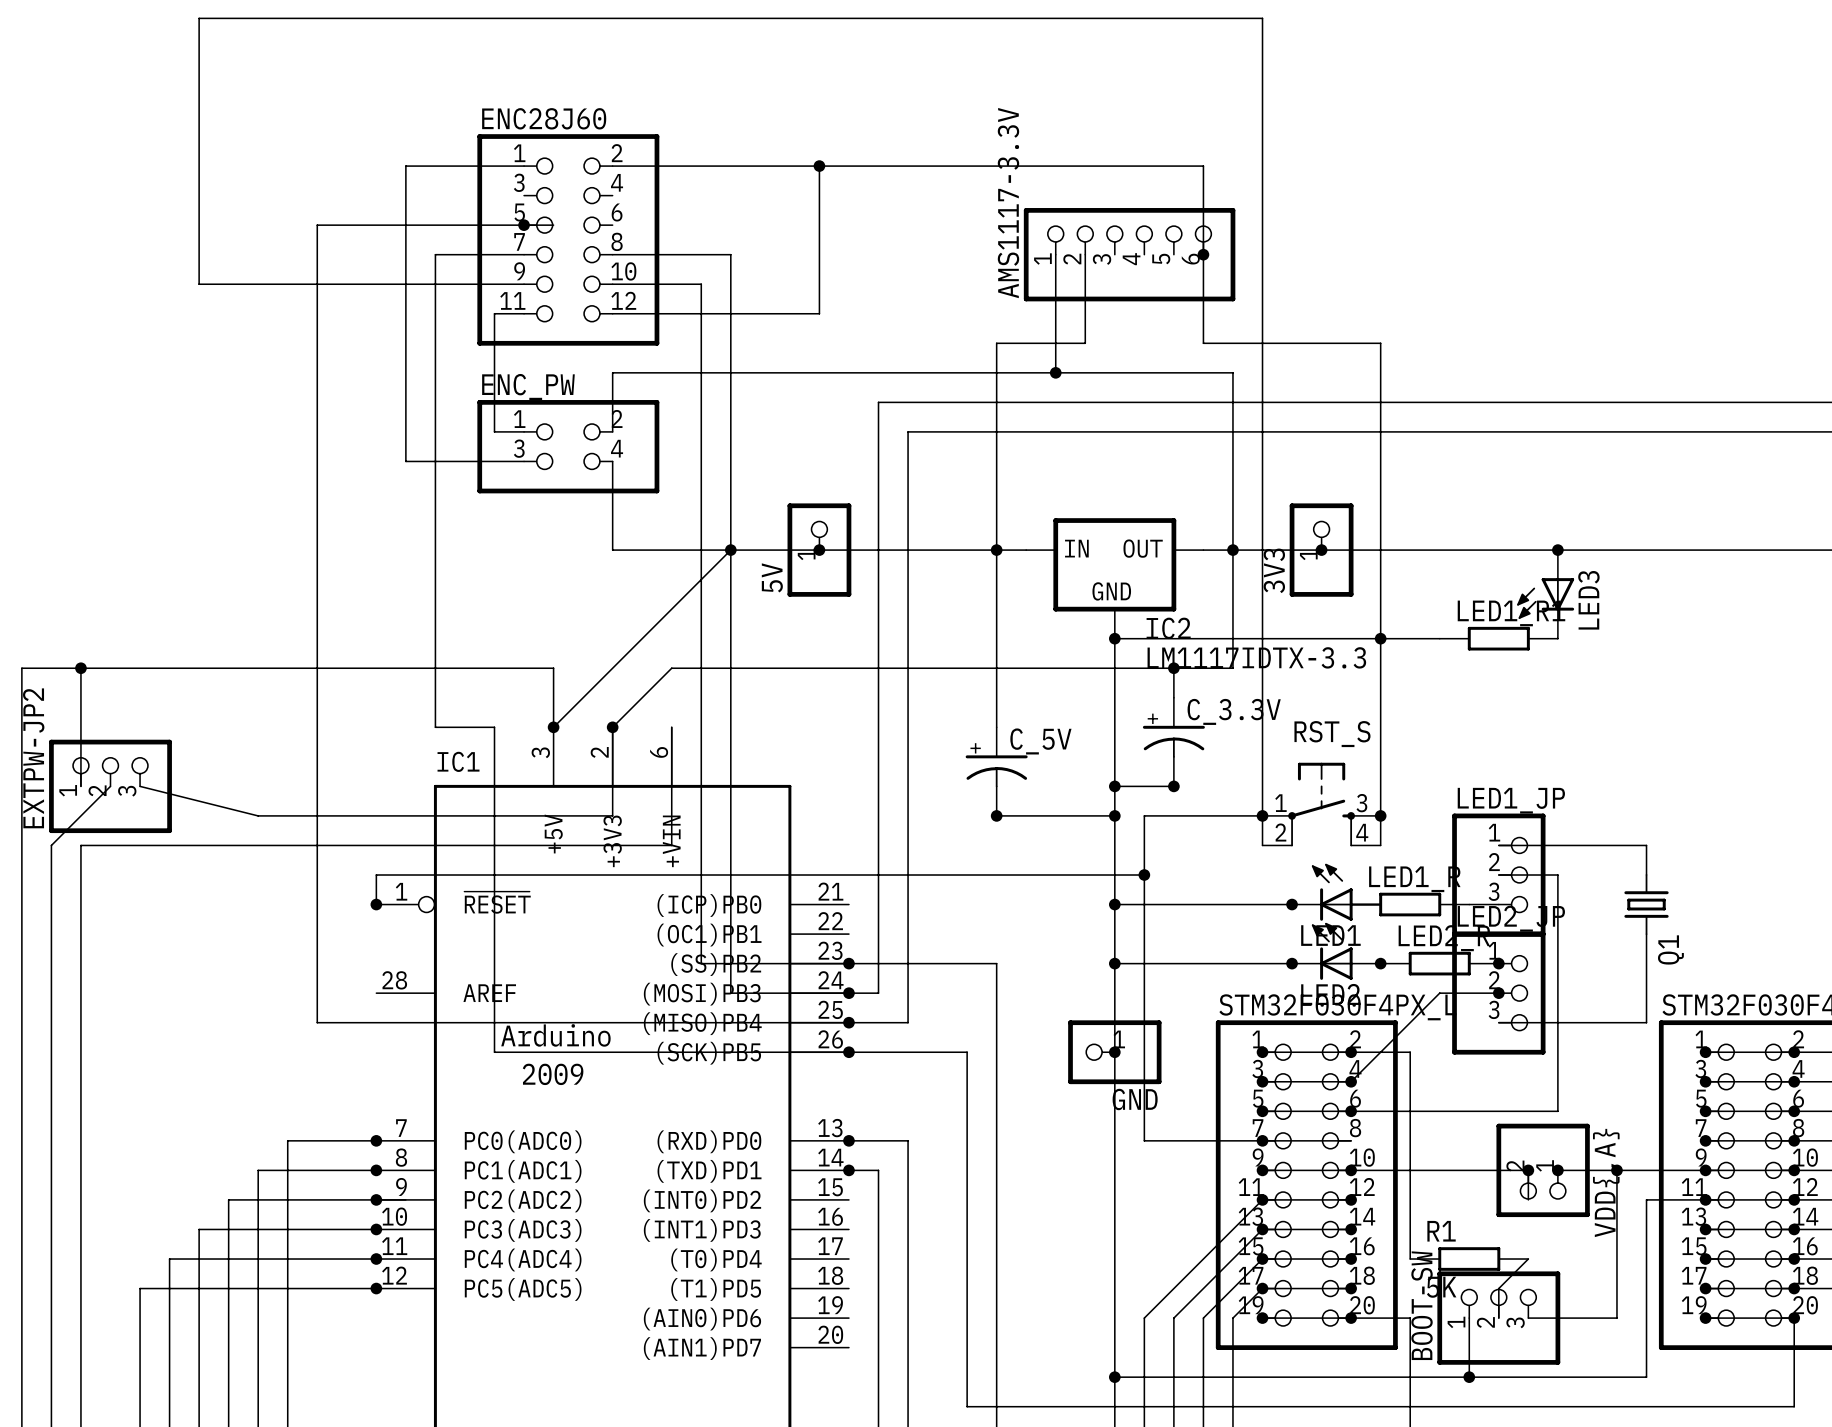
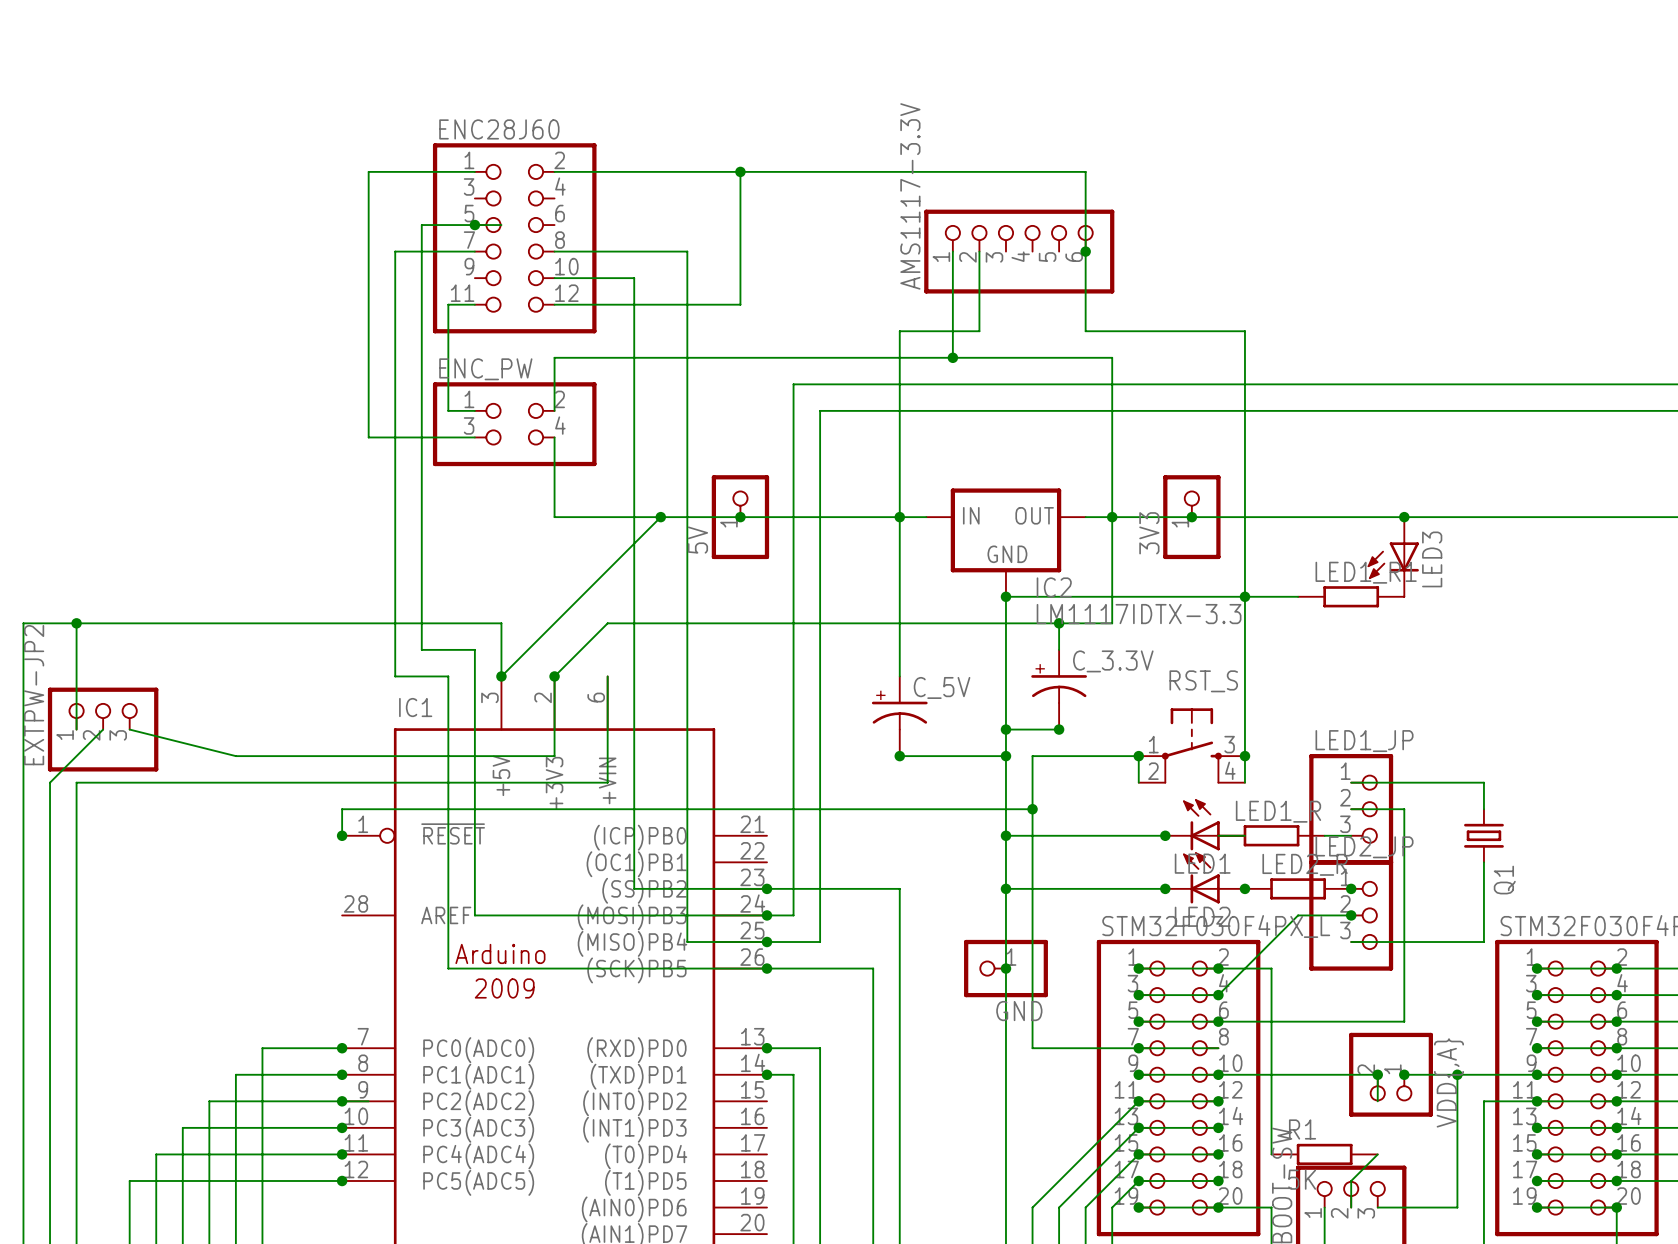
wire: (464, 225) (317, 225) (317, 1022) (760, 1022) -> (421, 225) (421, 649) (474, 649) (474, 915) (660, 915)
wire: (730, 254) (730, 993) -> (660, 251) (687, 251) (687, 942)
wire: (524, 284) (199, 284) (199, 18) (1262, 18) (1262, 815) -> none

